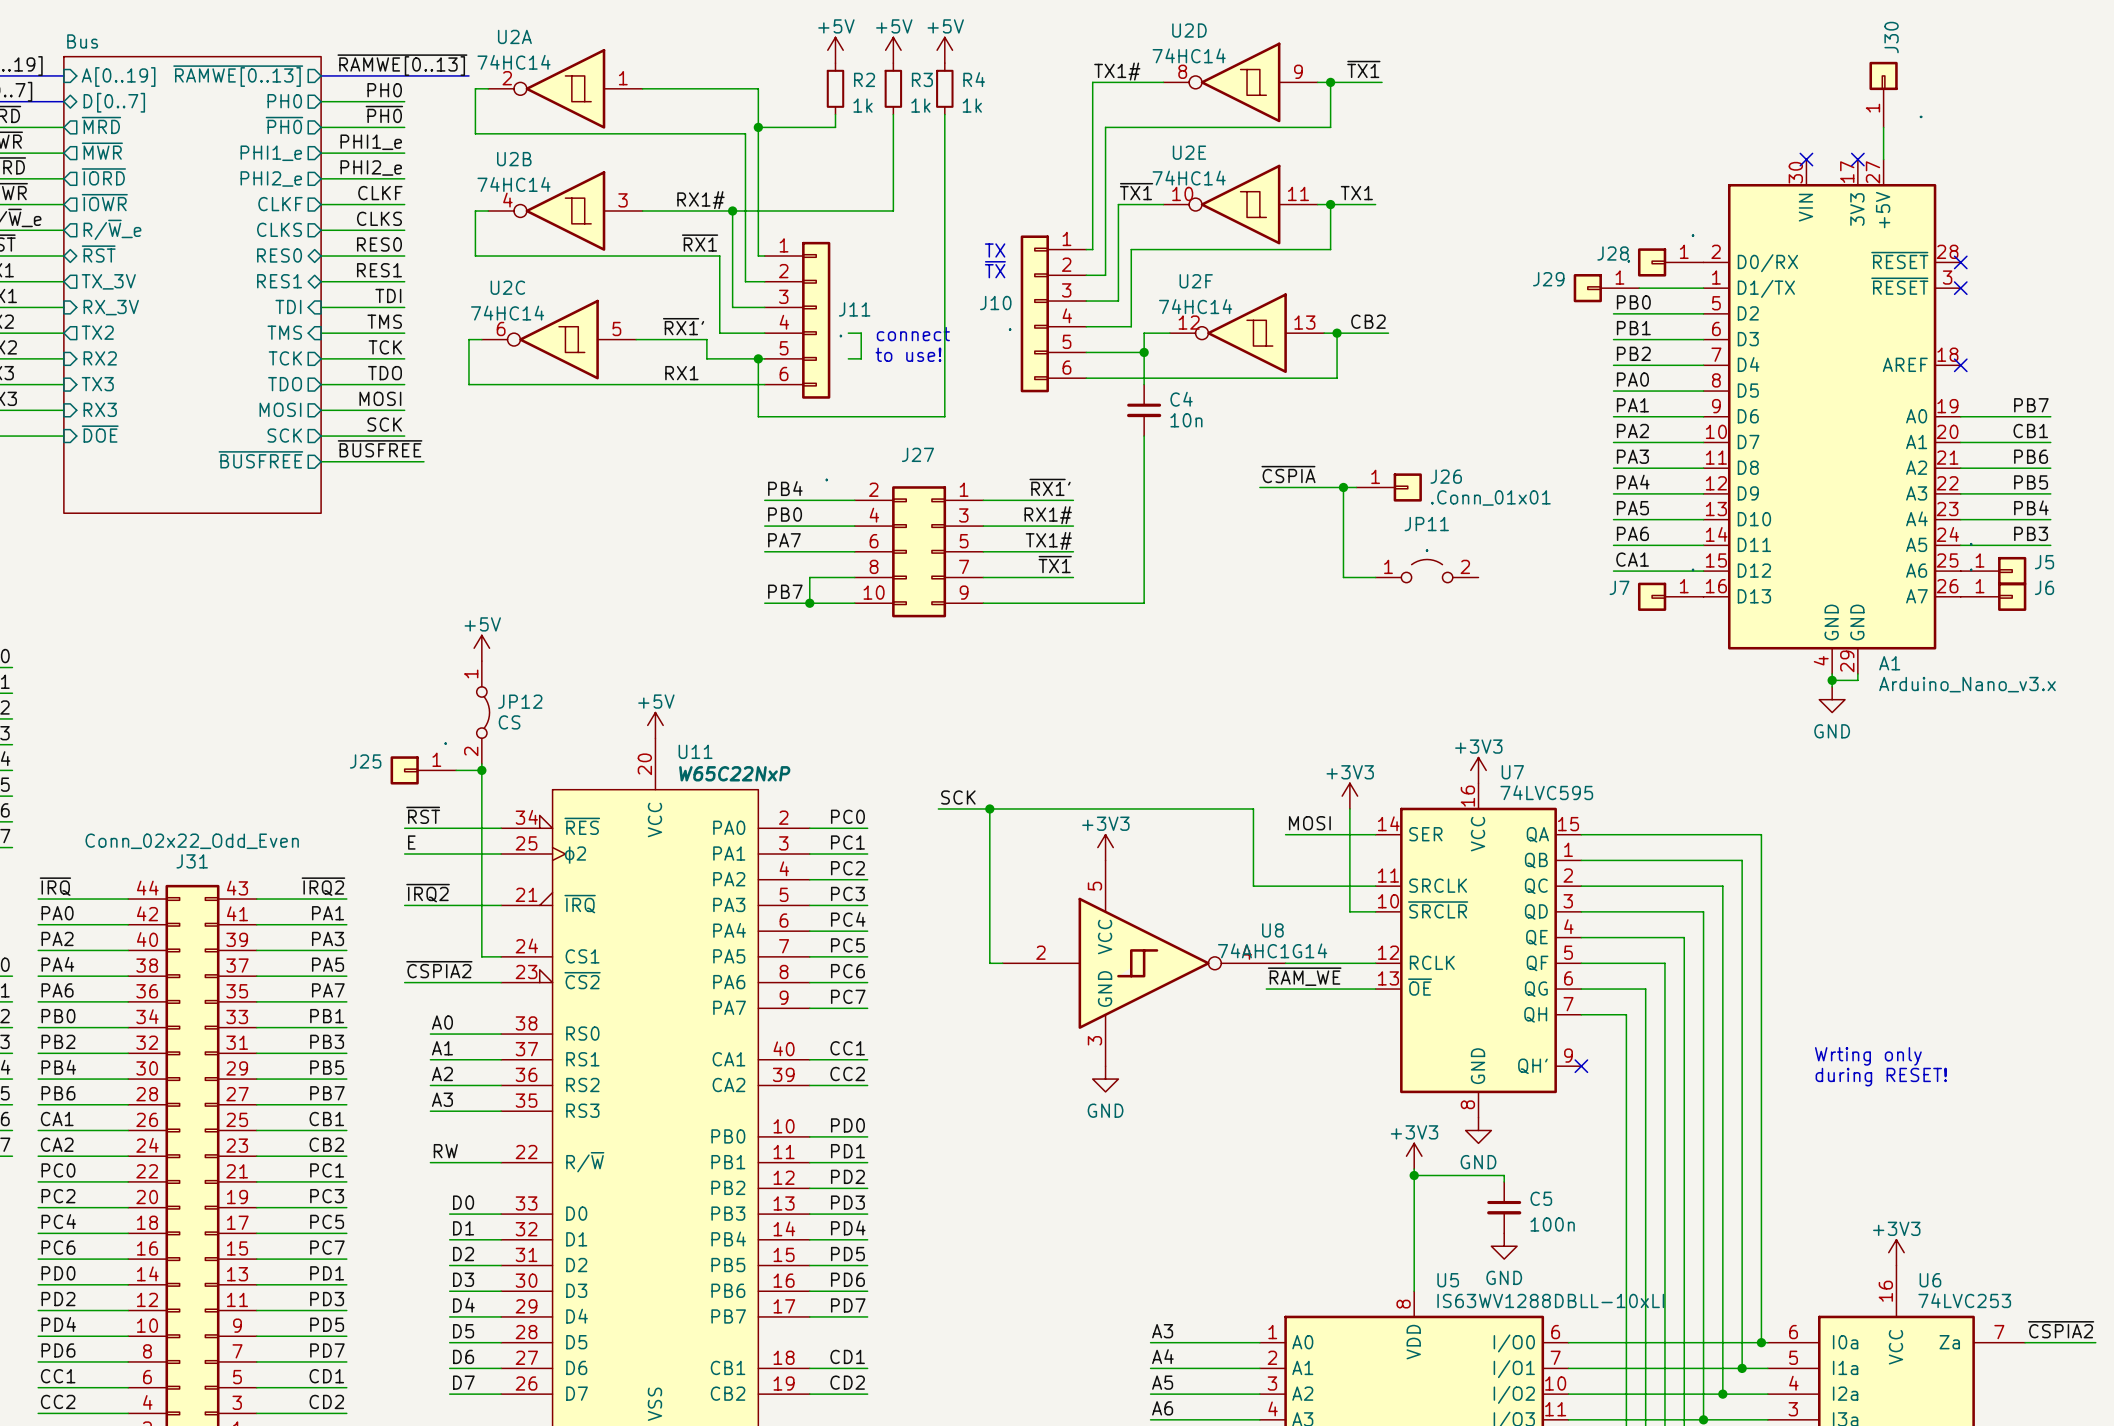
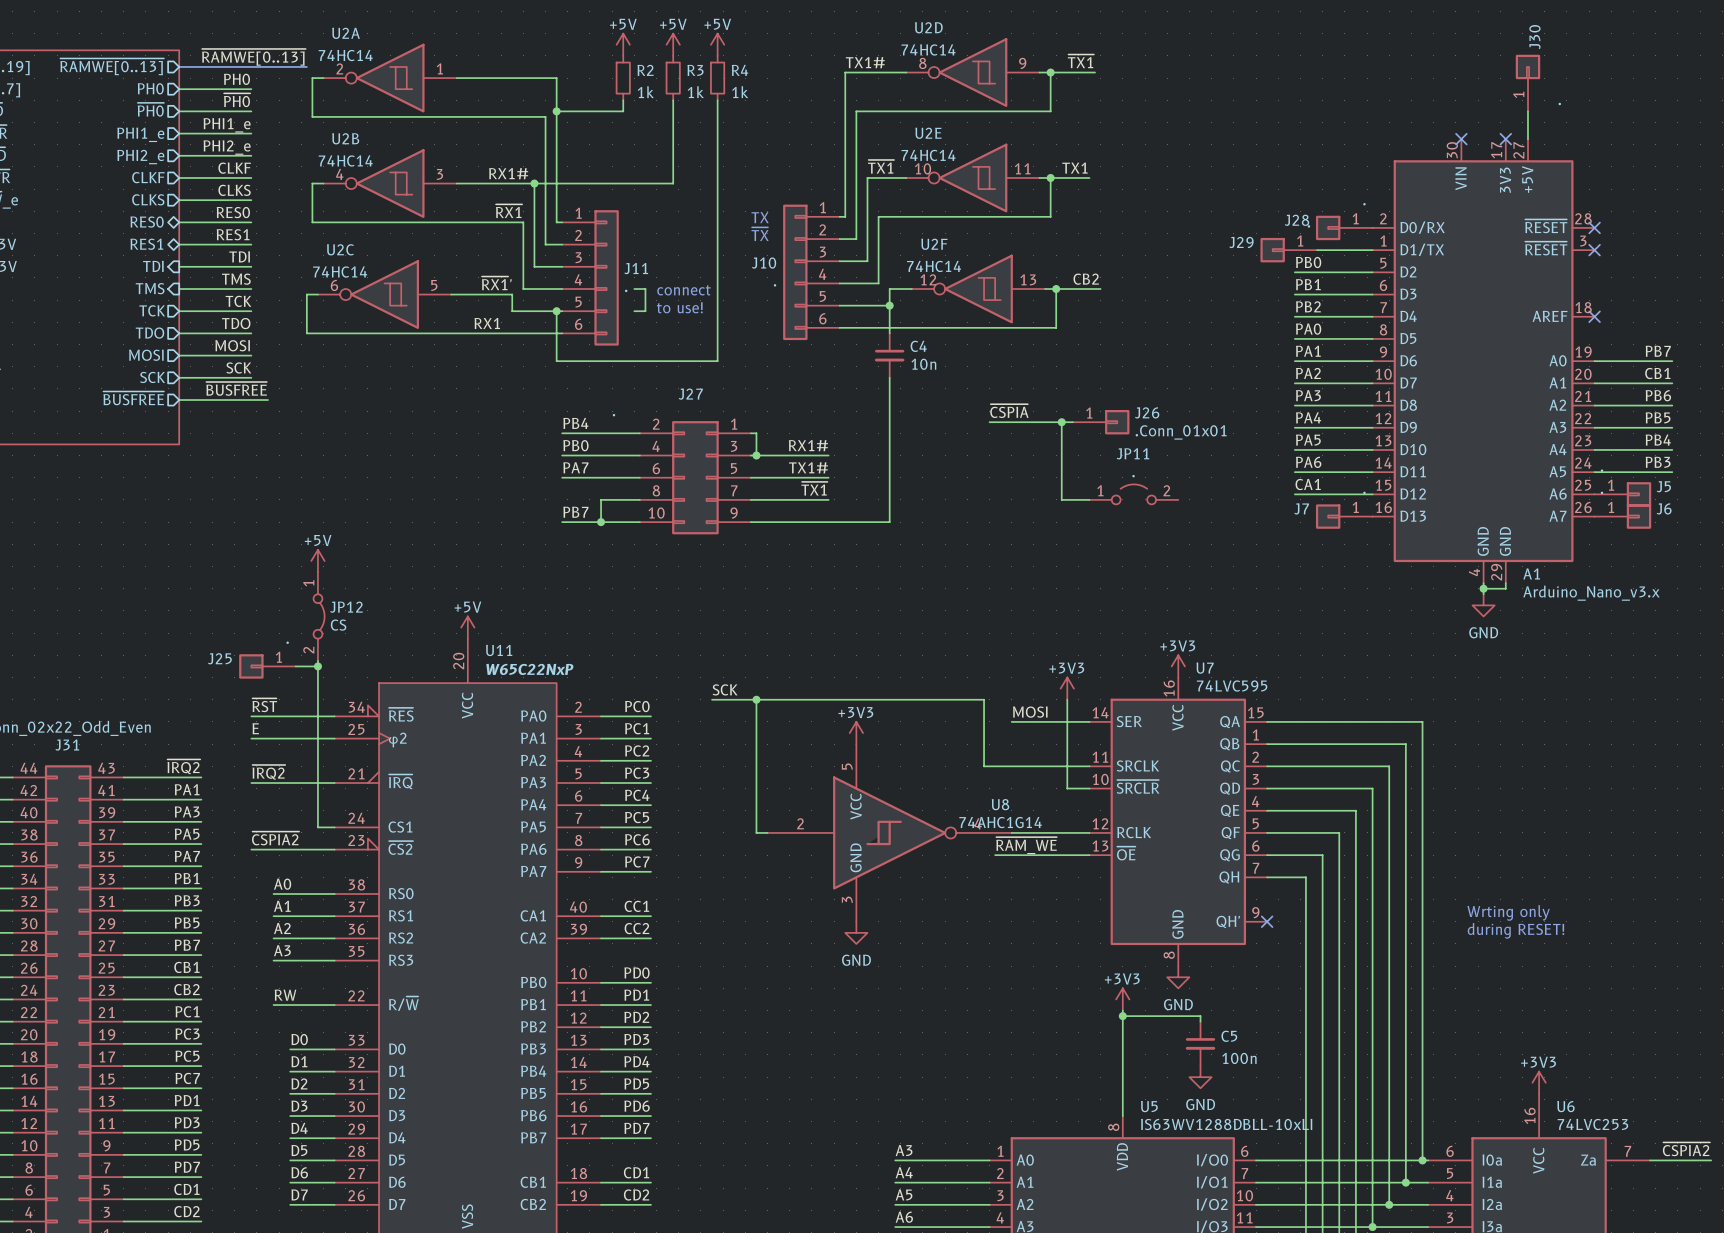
label: ~{RX1}' (1050, 487) -> none
wire: (989, 500) (1073, 500) -> (756, 433) (756, 455)
junction: none -> (756, 455)

